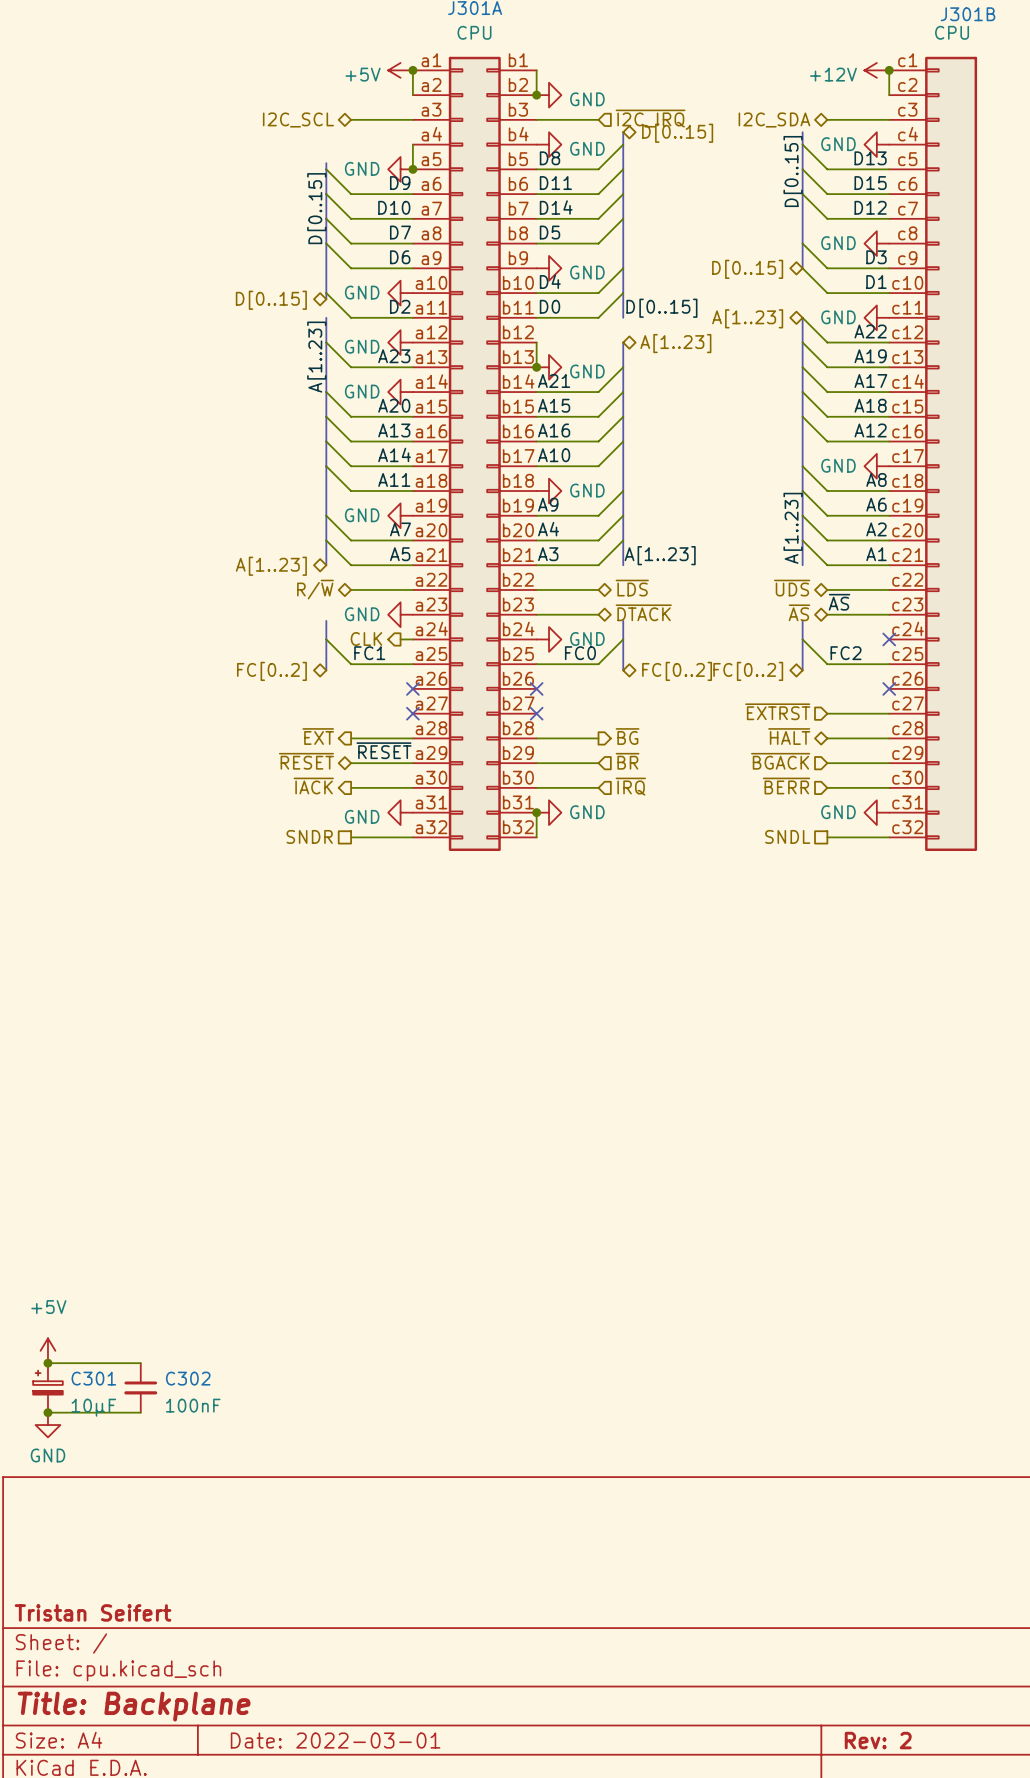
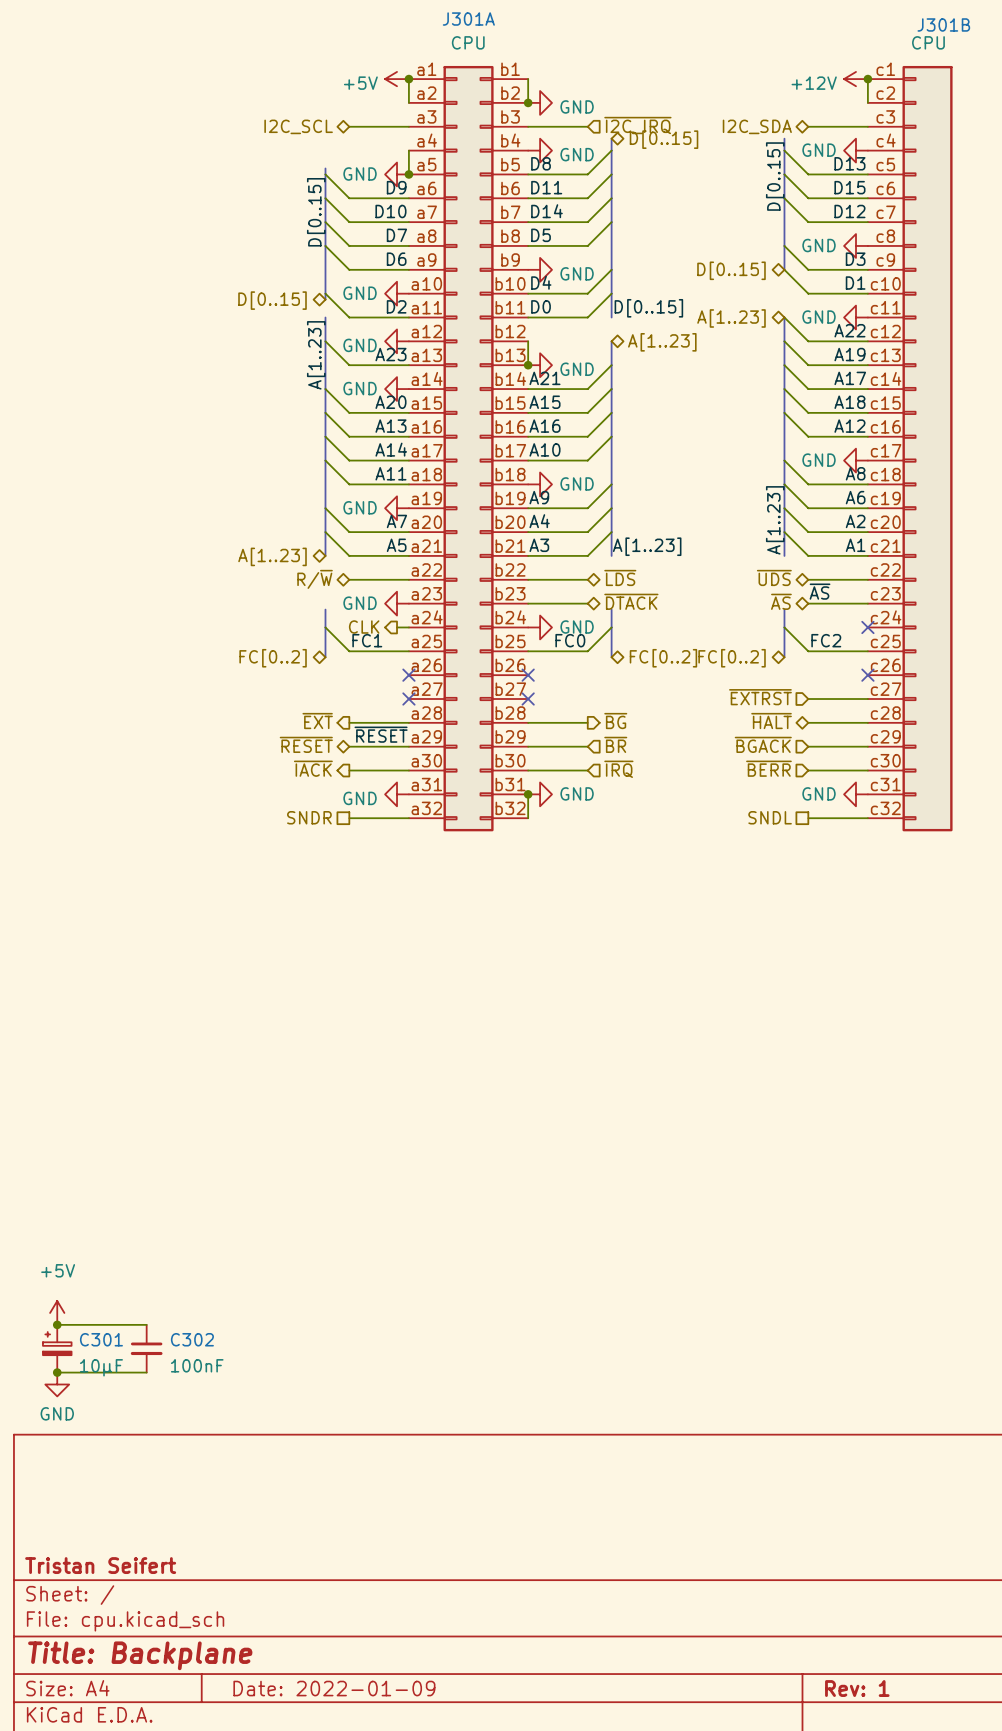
title block: Date: 2022-03-01 (335, 1740) -> Date: 2022-01-09 (334, 1688)
title block: Rev: 2 (878, 1740) -> Rev: 1 (857, 1688)

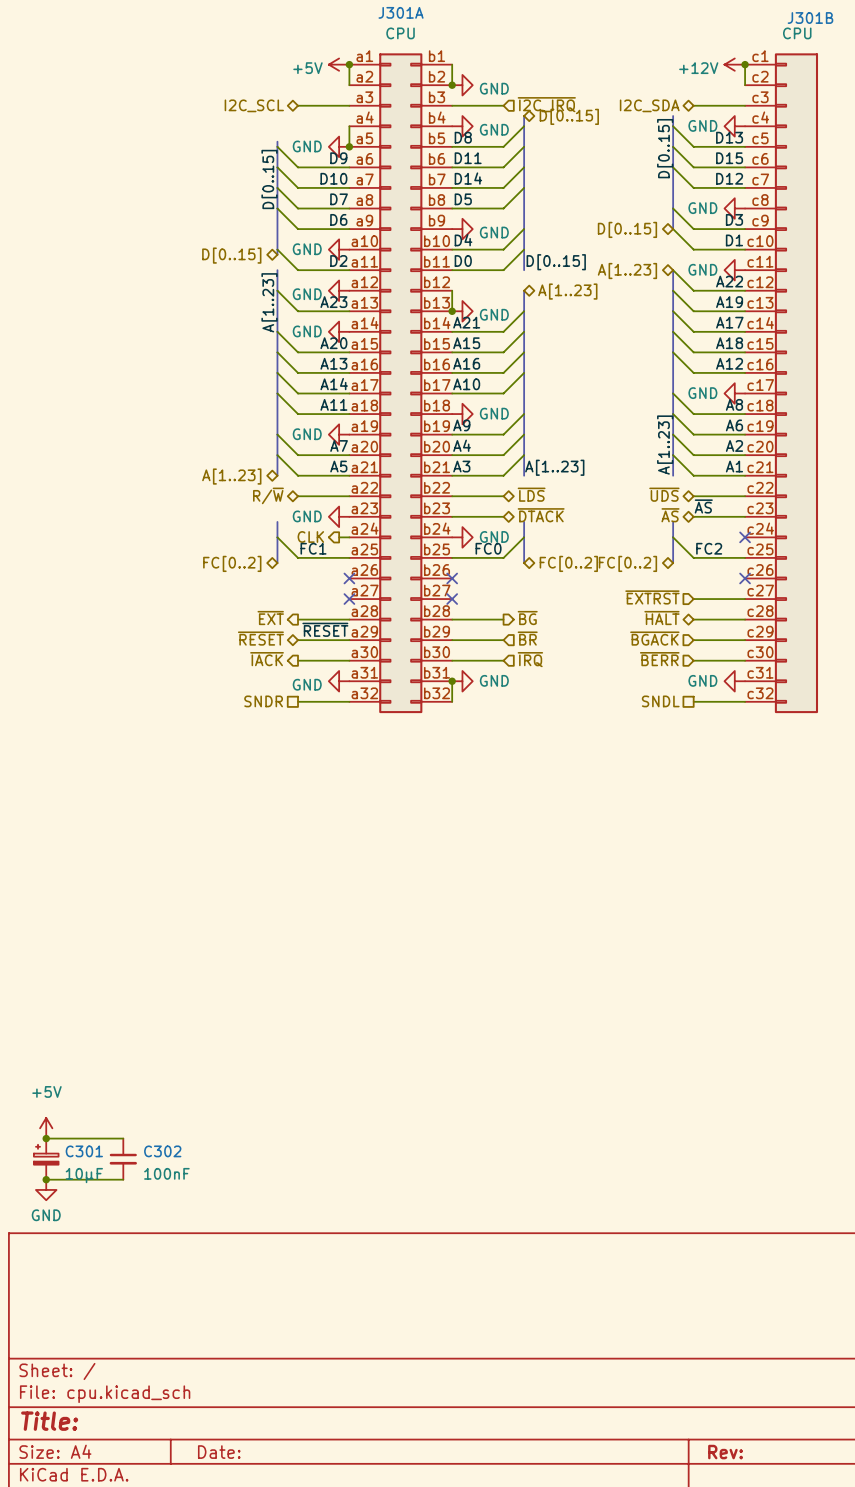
title block: Tristan Seifert (100, 1565) -> none
title block: Title: Backplane (140, 1655) -> Title: (49, 1421)
title block: Date: 2022-01-09 (334, 1688) -> Date: (219, 1452)
title block: Rev: 1 (857, 1688) -> Rev: (725, 1452)

